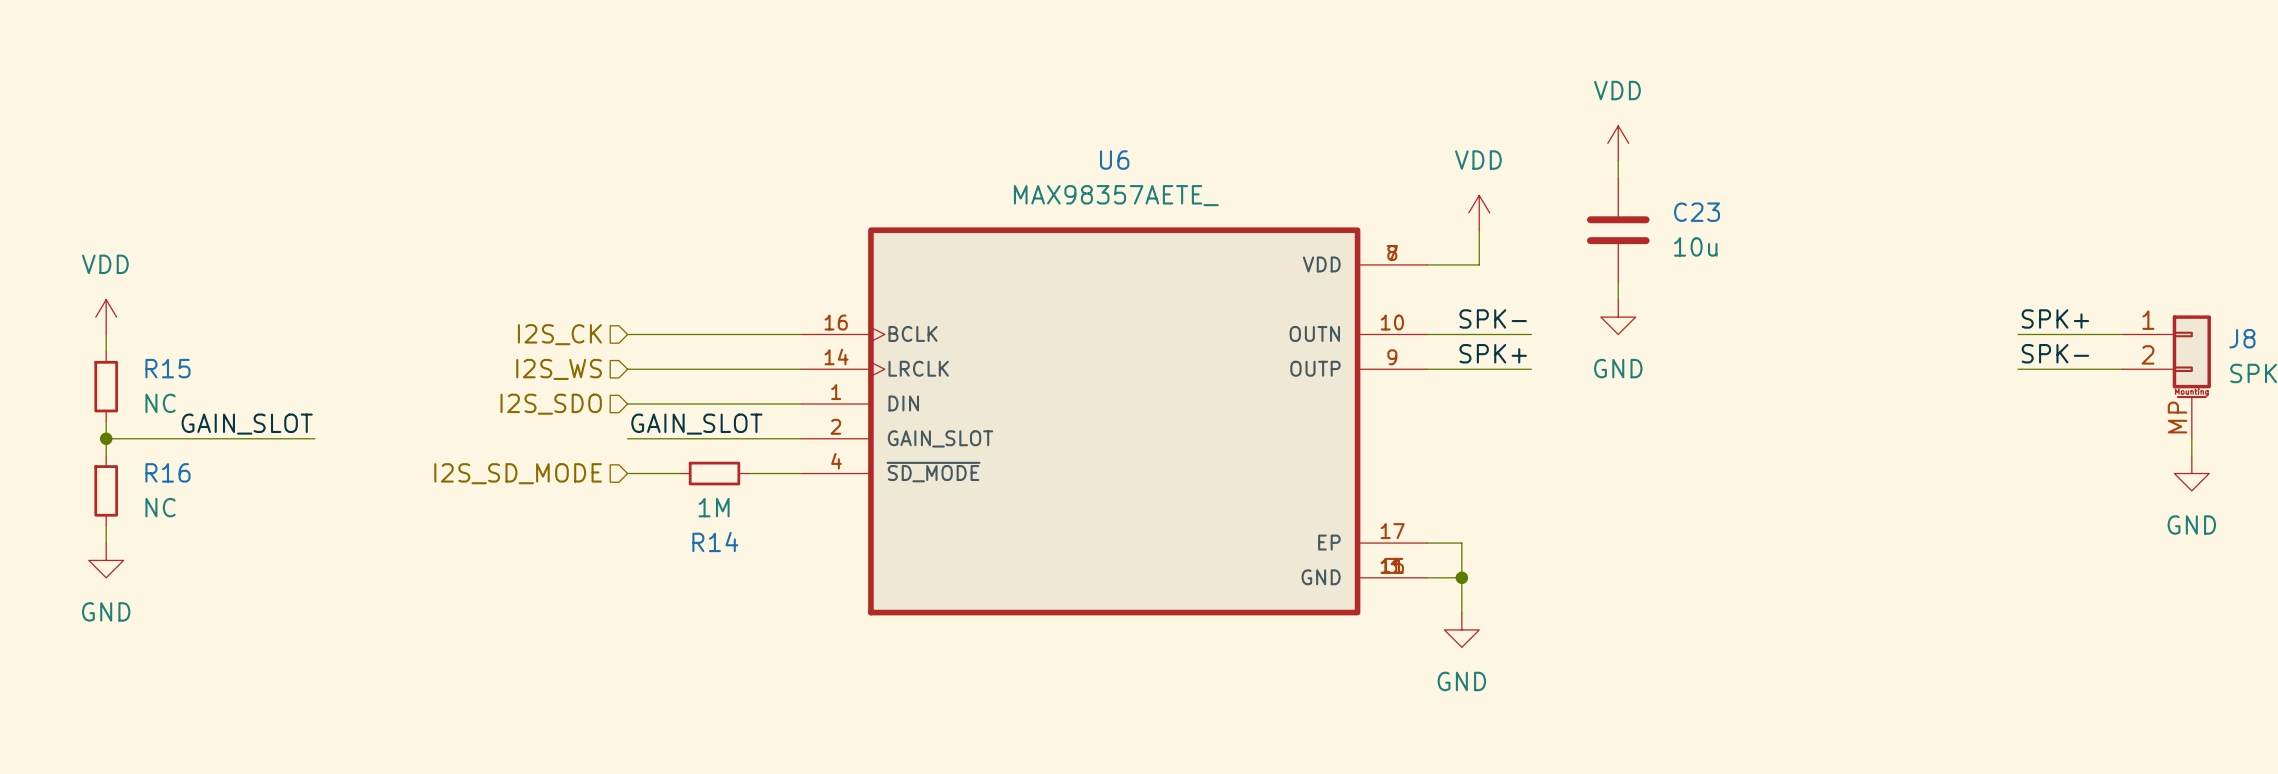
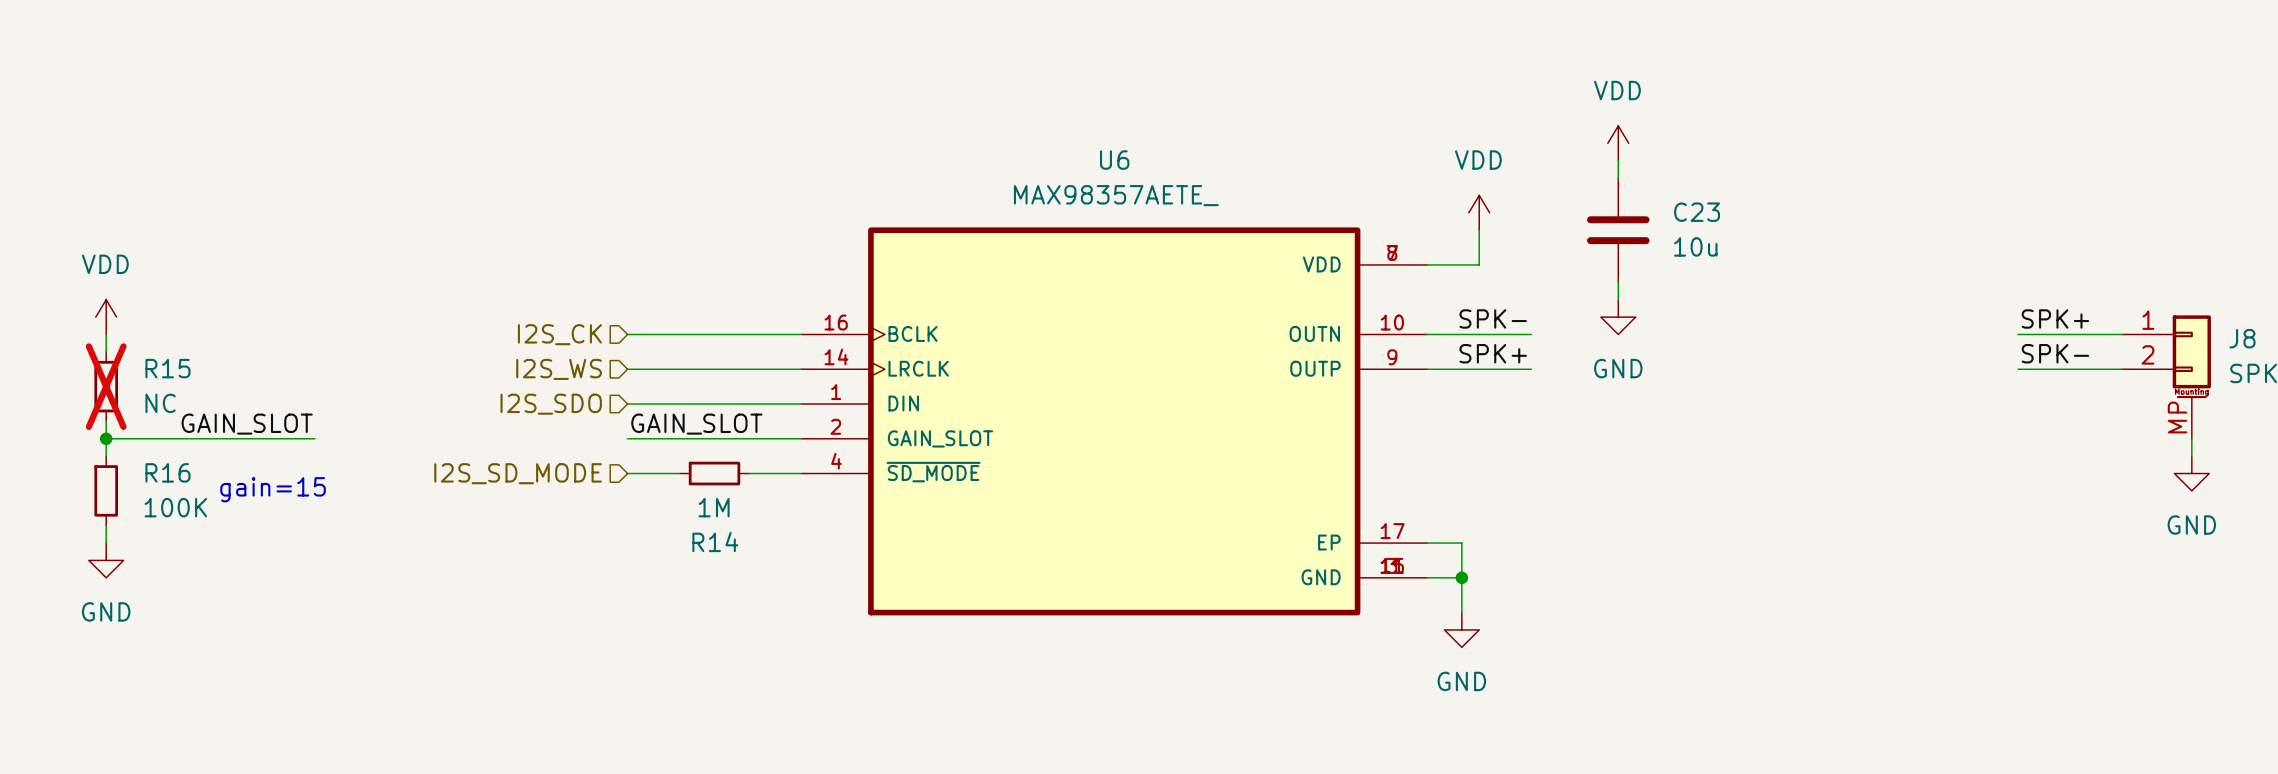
R15 do-not-place cross: none -> (106, 386)
text: none -> gain=15 (273, 489)
R16 value: NC (160, 507) -> 100K (175, 507)

